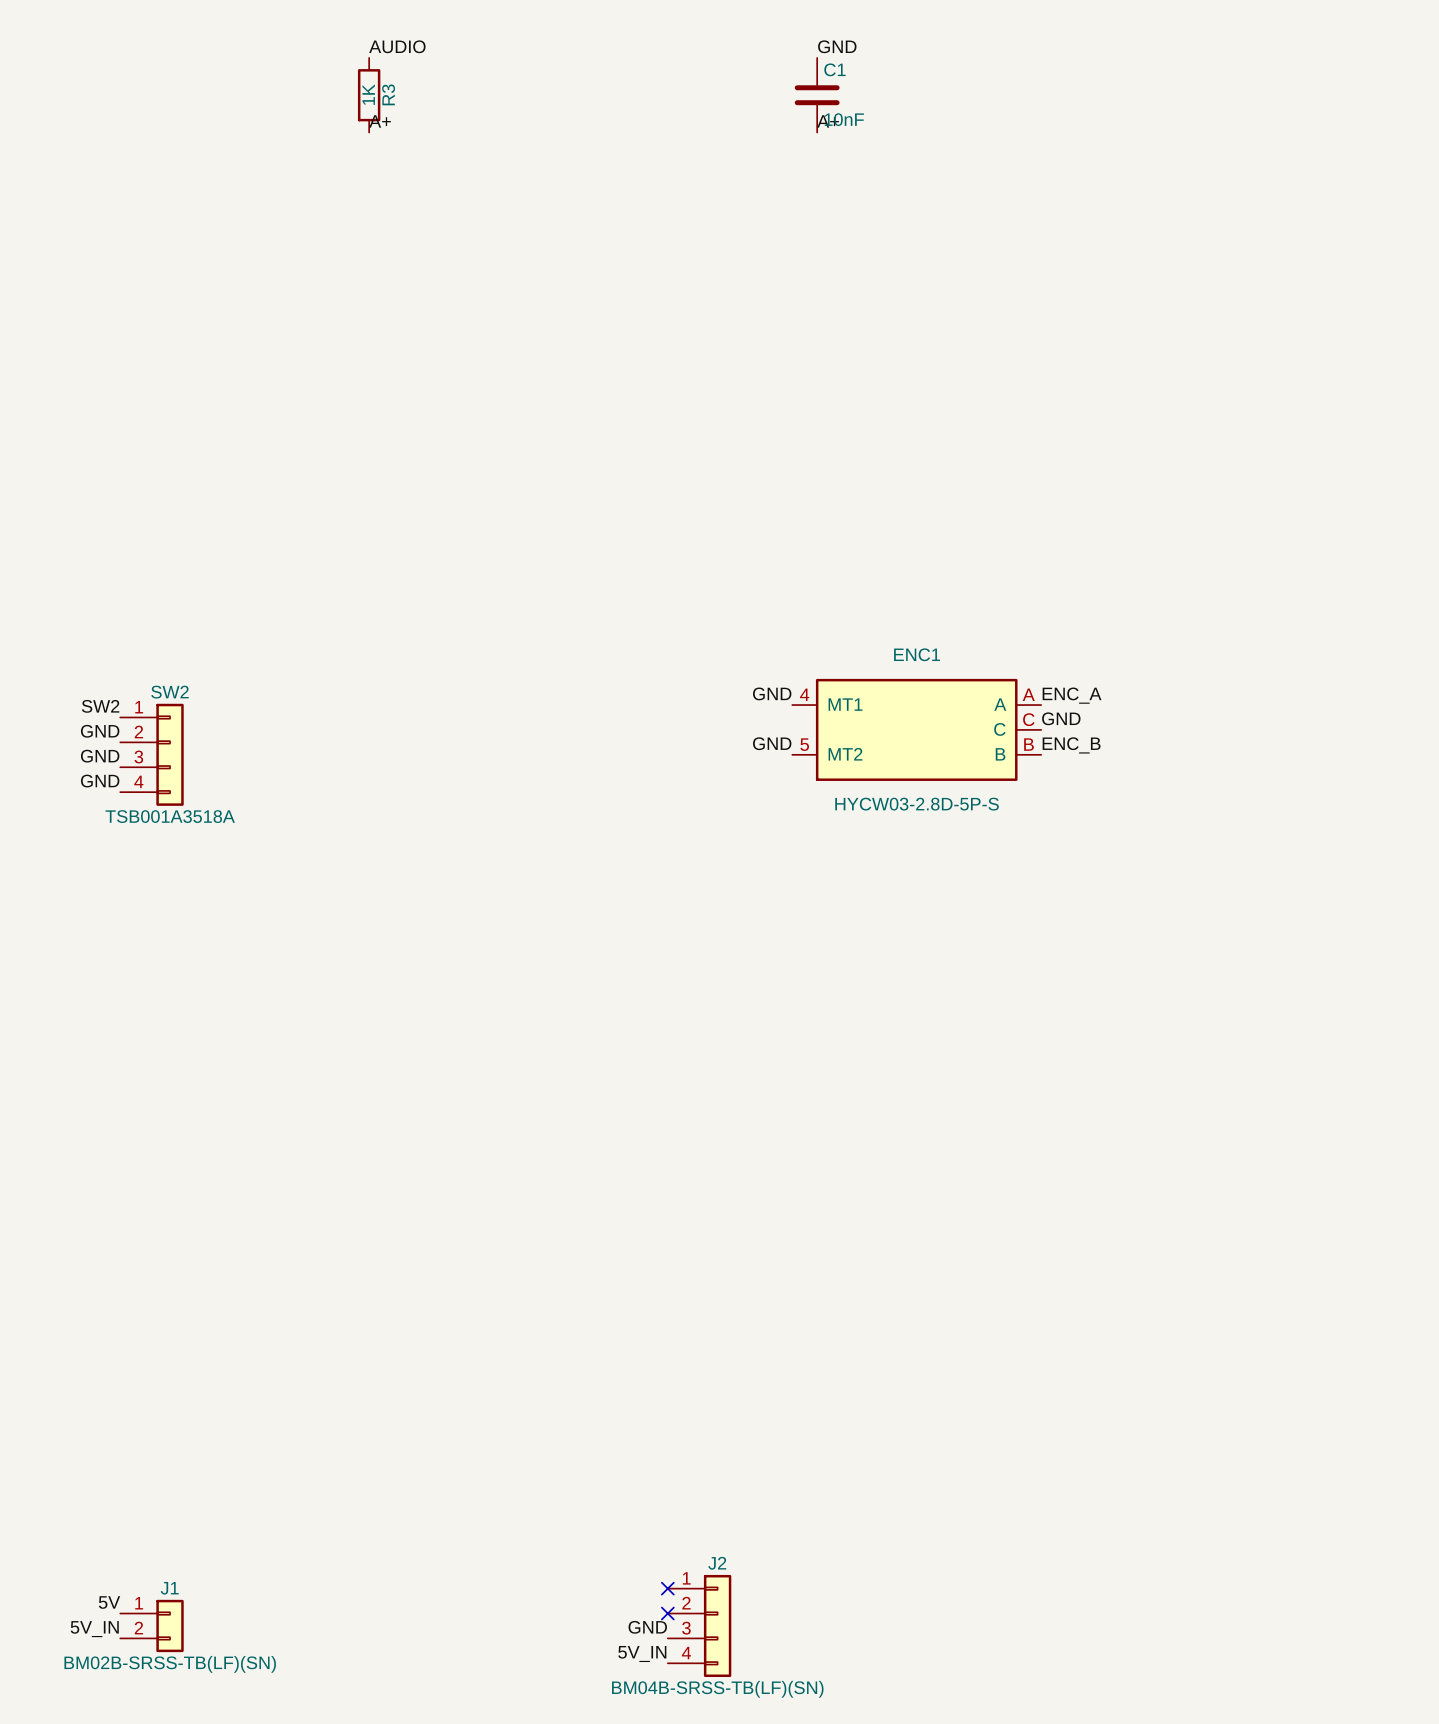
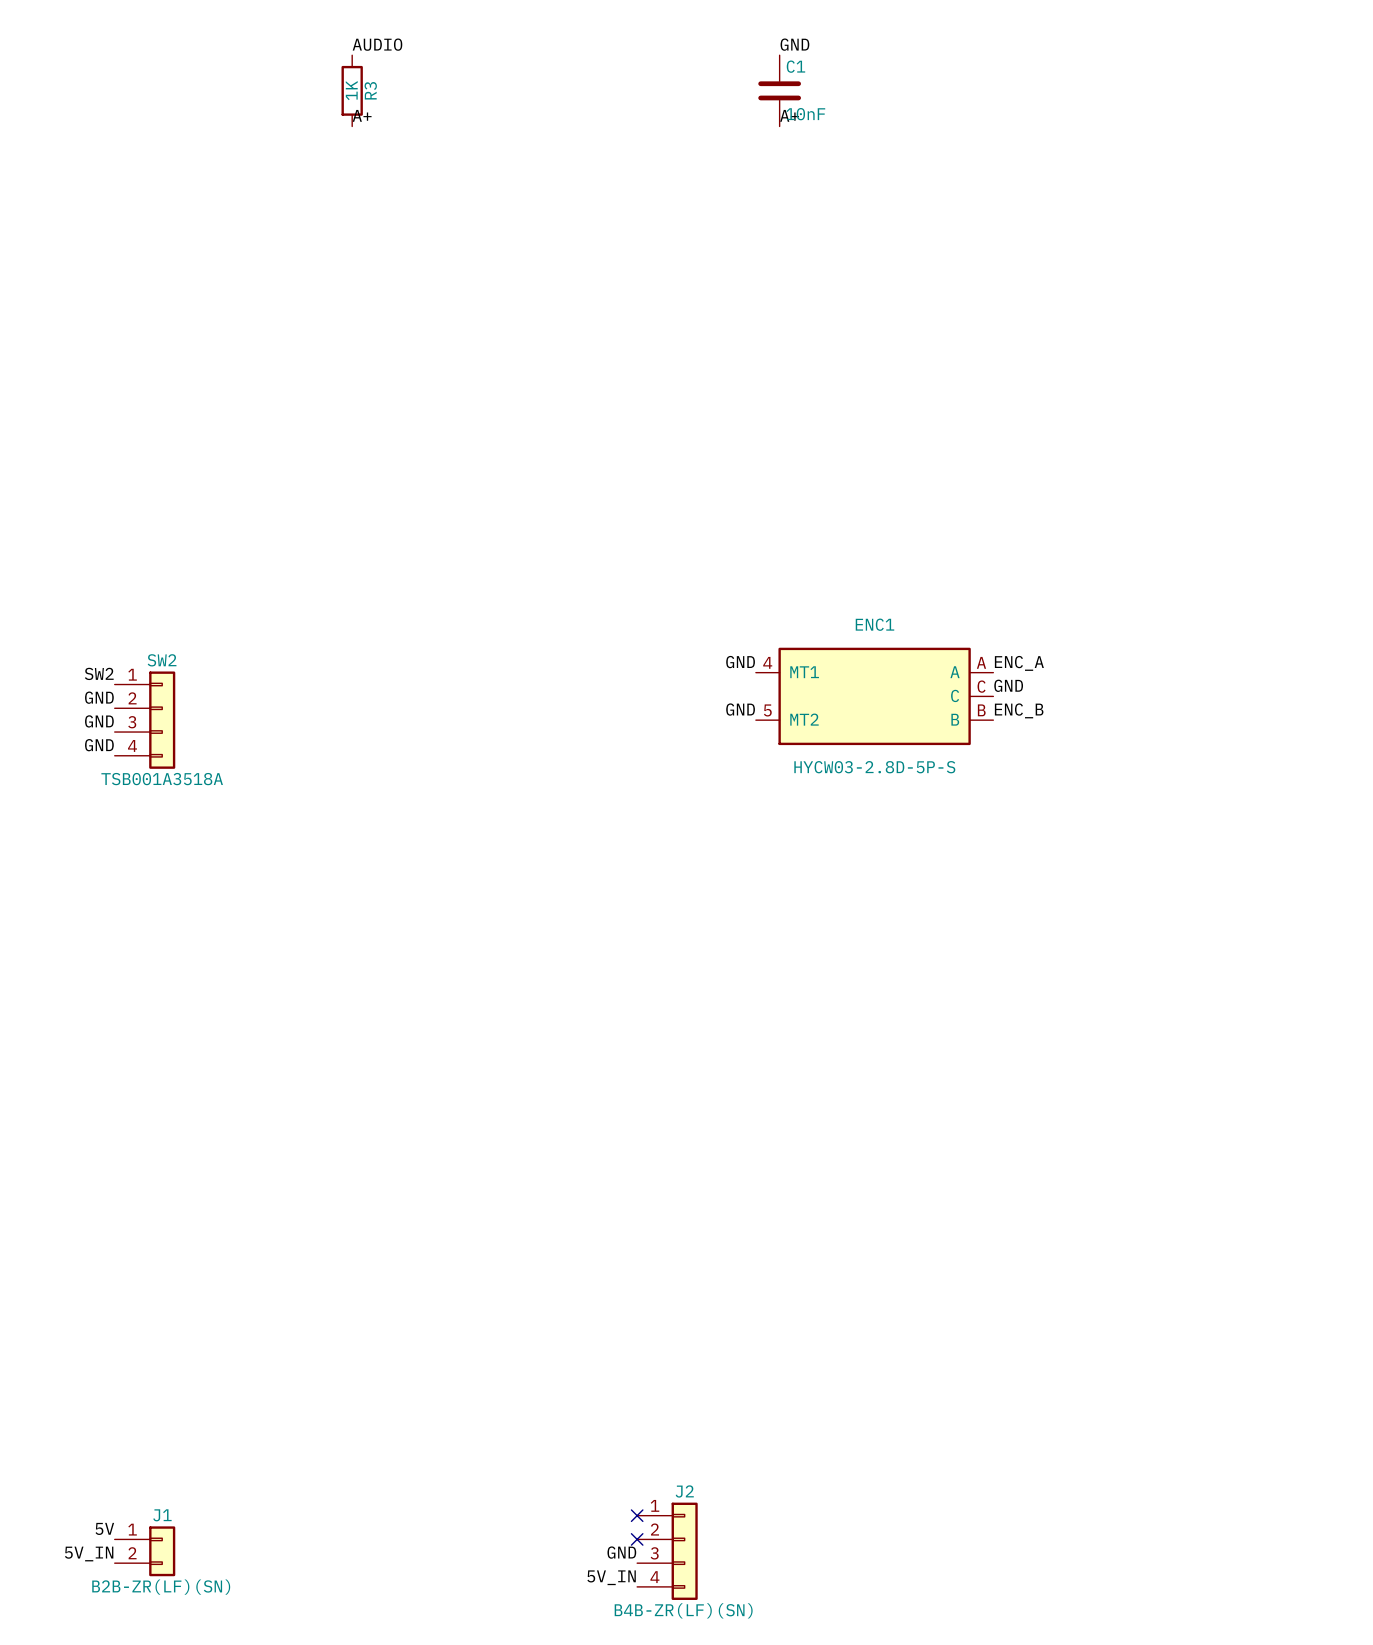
J1 value: BM02B-SRSS-TB(LF)(SN) (170, 1664) -> B2B-ZR(LF)(SN) (161, 1587)
J2 value: BM04B-SRSS-TB(LF)(SN) (717, 1689) -> B4B-ZR(LF)(SN) (683, 1610)

